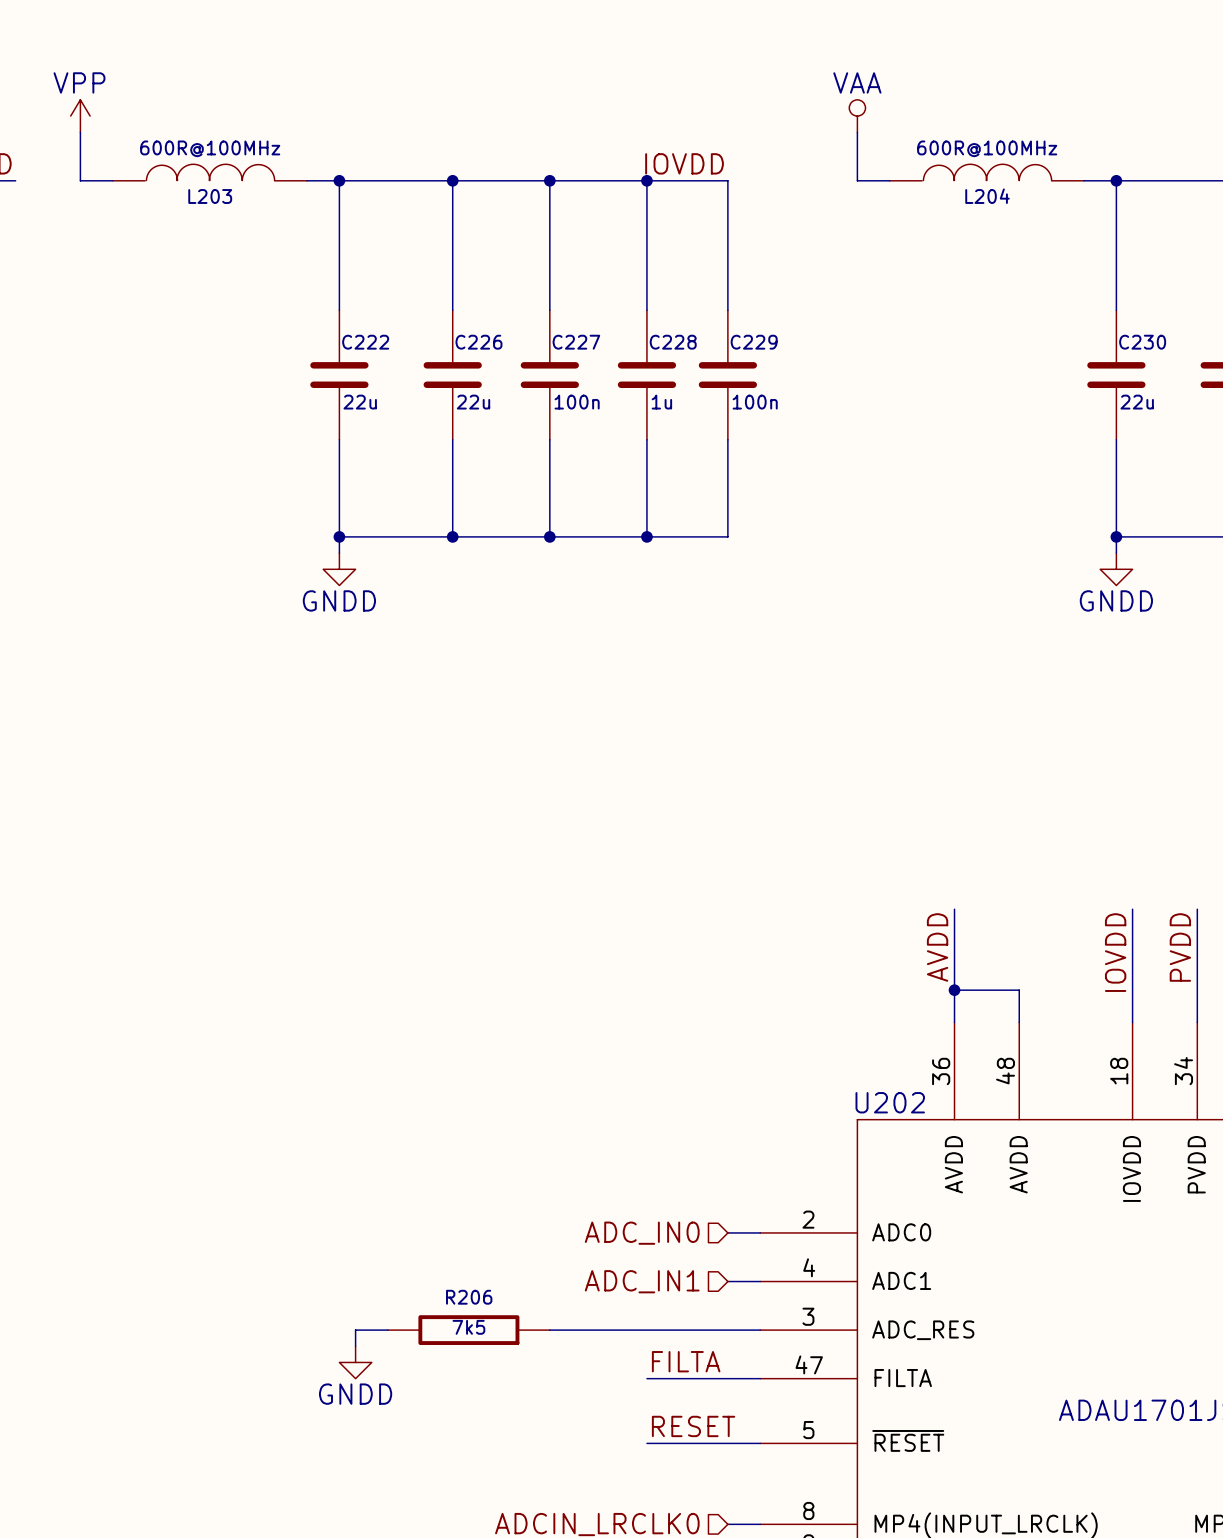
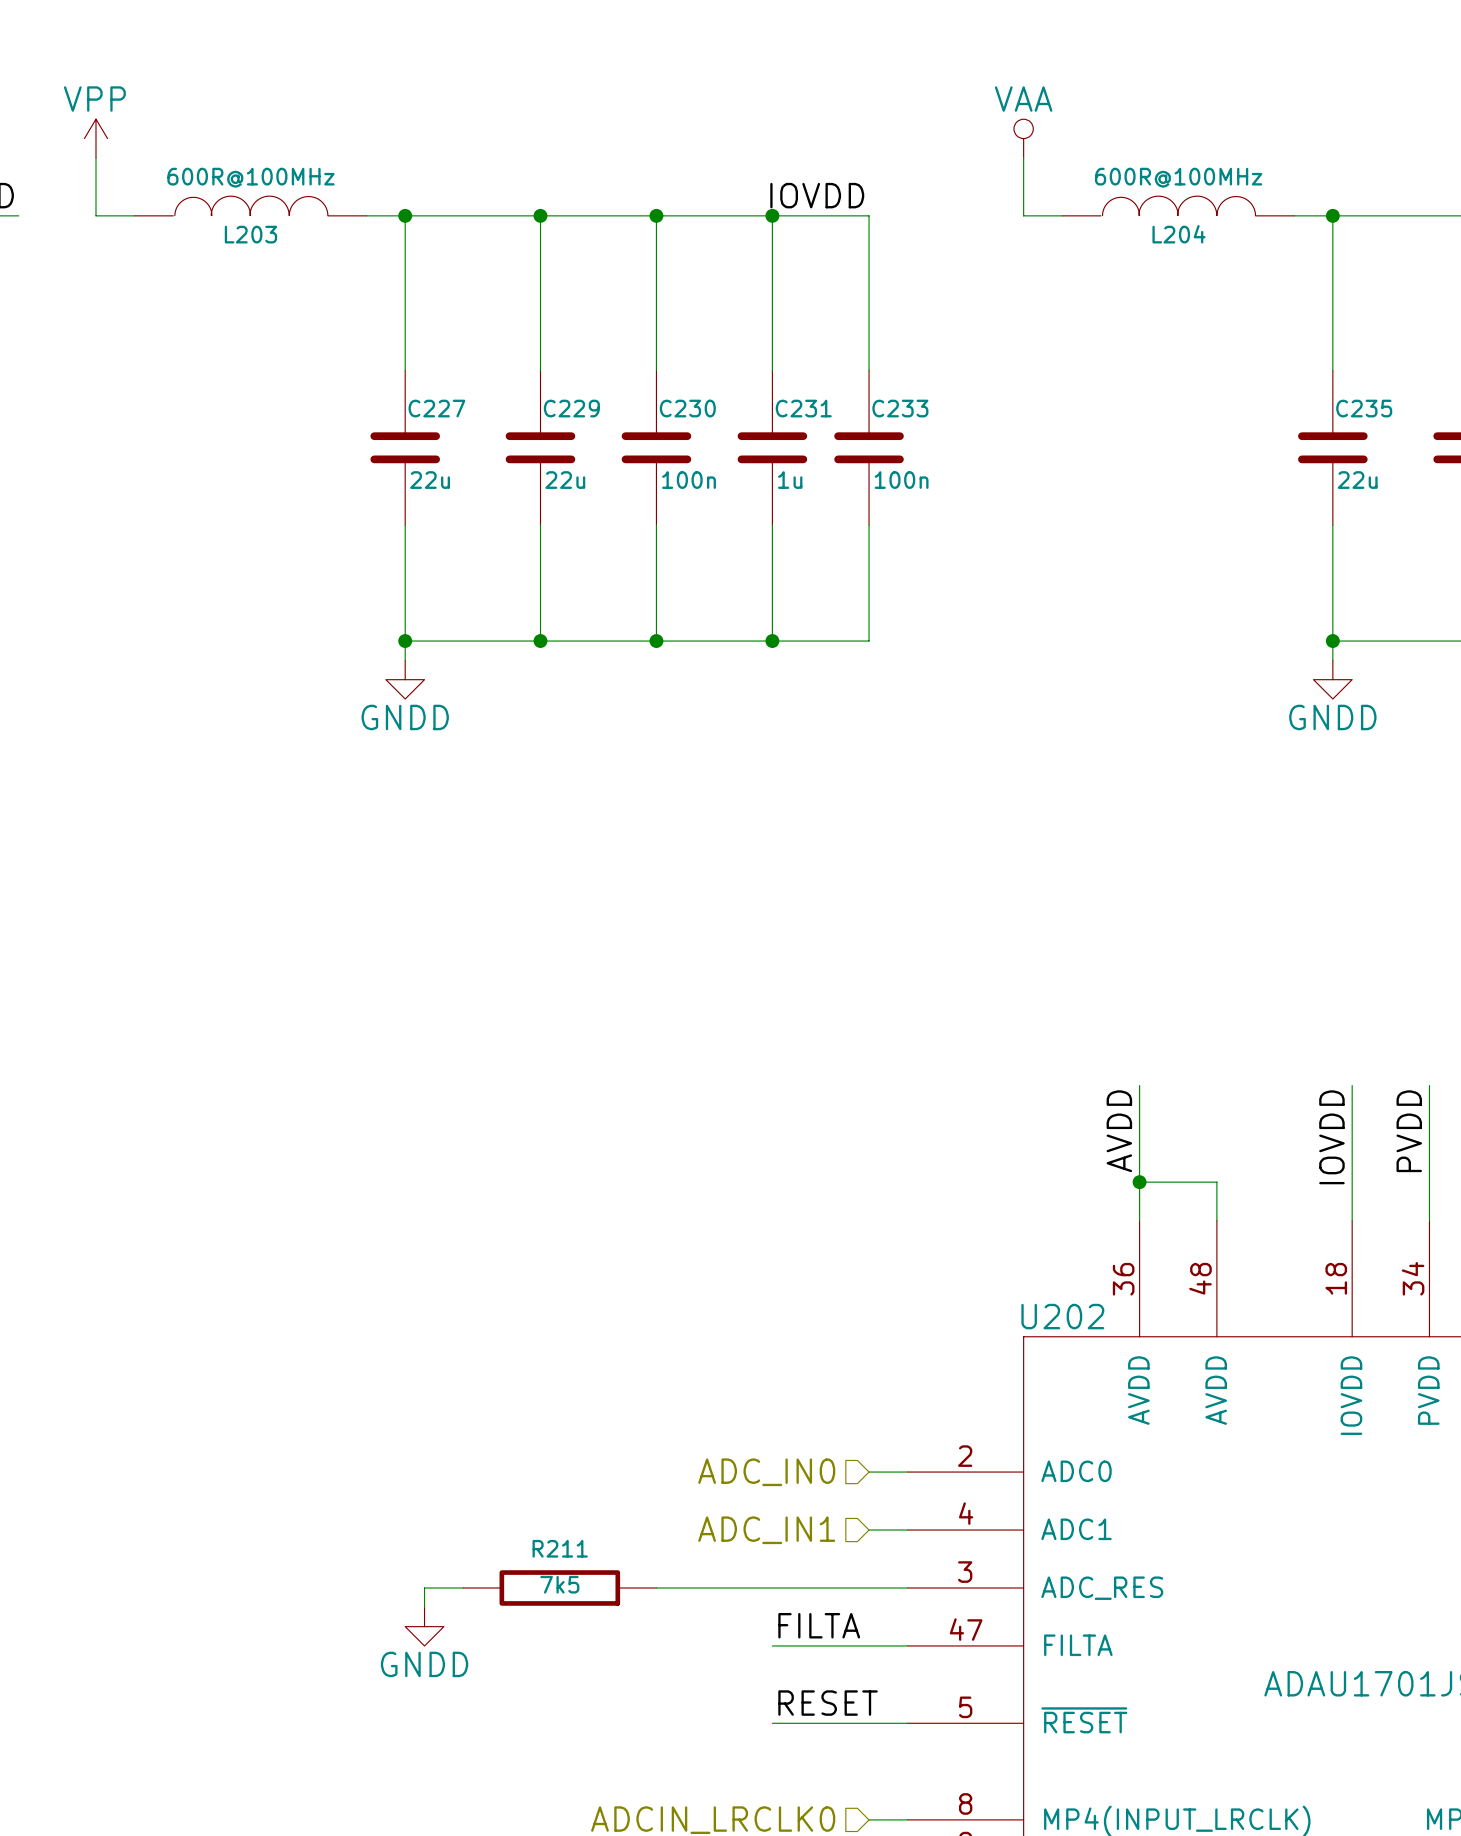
C222 name: C222 (365, 342) -> C227 (436, 408)
C226 name: C226 (478, 342) -> C229 (571, 408)
C227 name: C227 (576, 342) -> C230 (687, 408)
C228 name: C228 (673, 342) -> C231 (803, 408)
C229 name: C229 (754, 342) -> C233 (900, 408)
C230 name: C230 (1142, 342) -> C235 (1364, 408)
R206 name: R206 (469, 1297) -> R211 (560, 1548)

